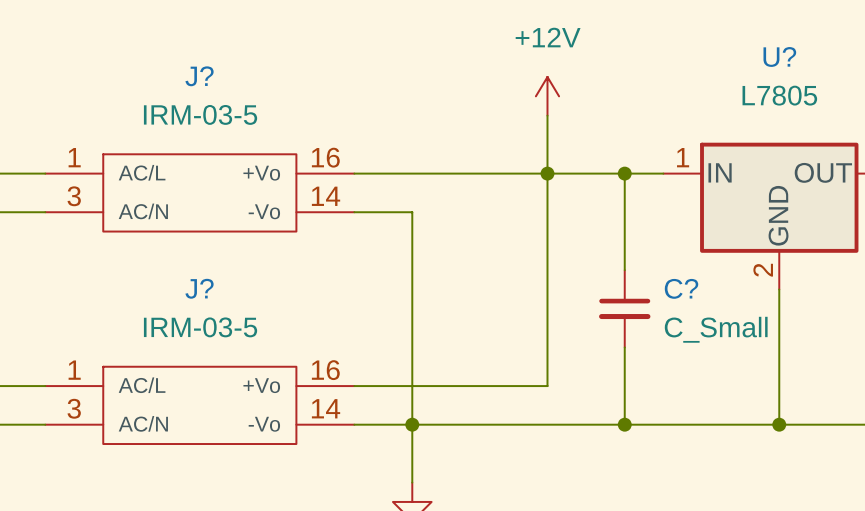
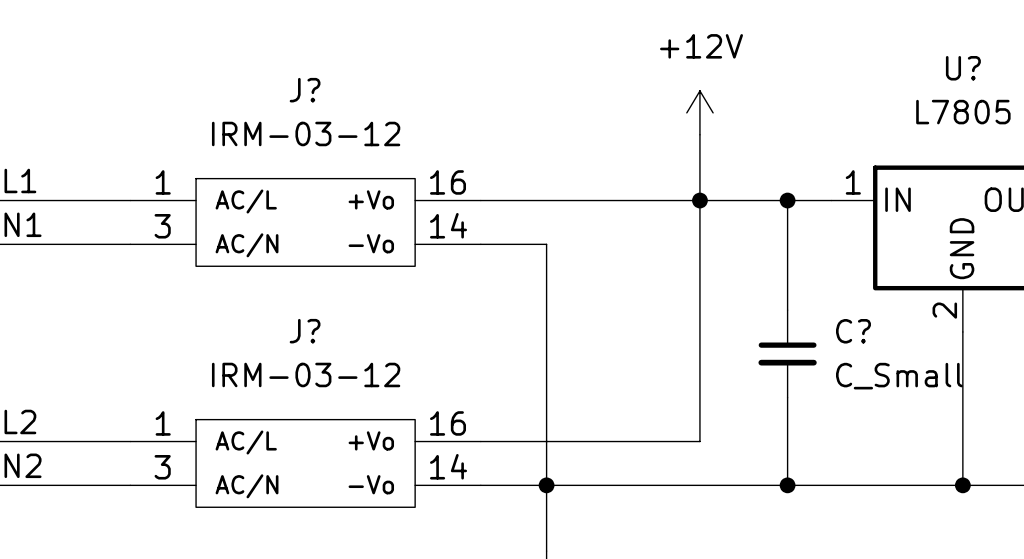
J? value: IRM-03-5 (200, 114) -> IRM-03-12 (306, 133)
J? value: IRM-03-5 (200, 327) -> IRM-03-12 (306, 374)

